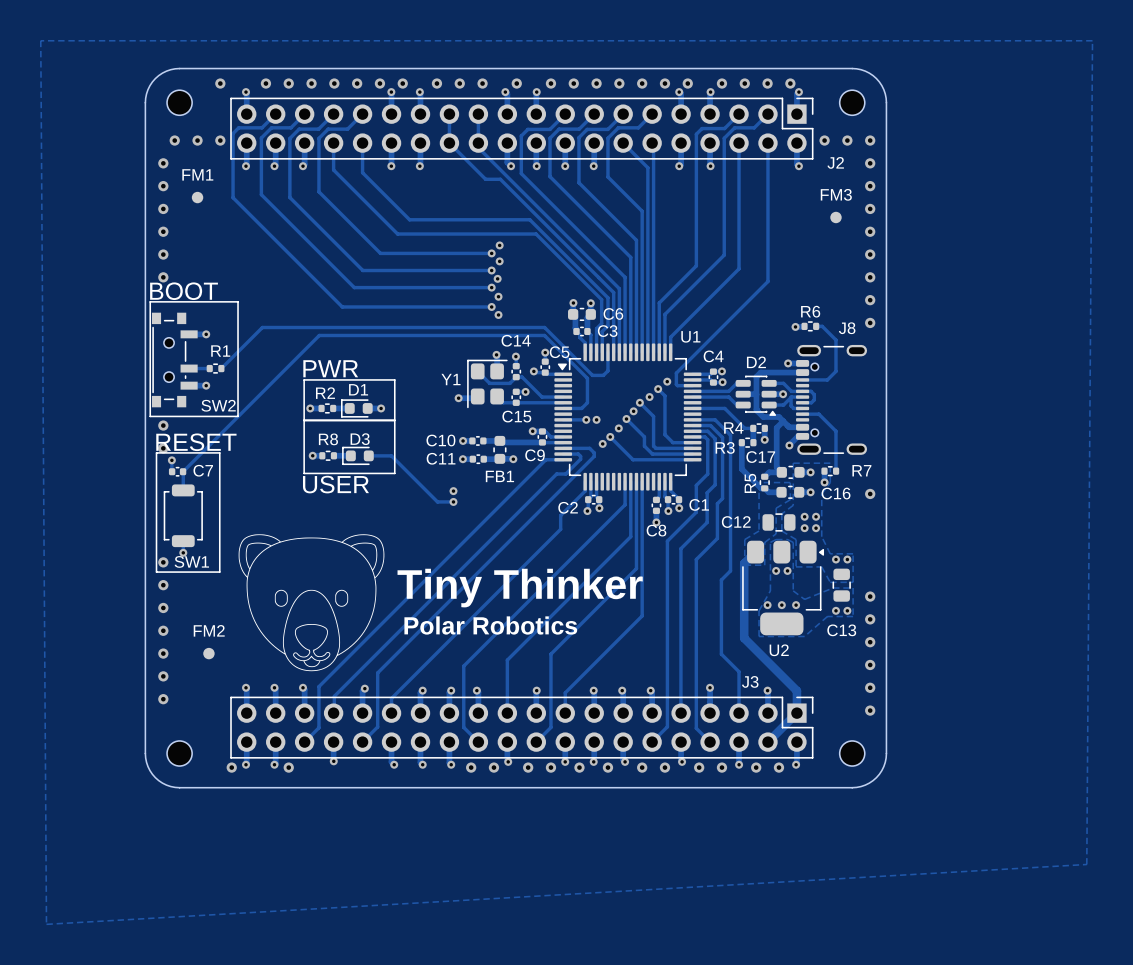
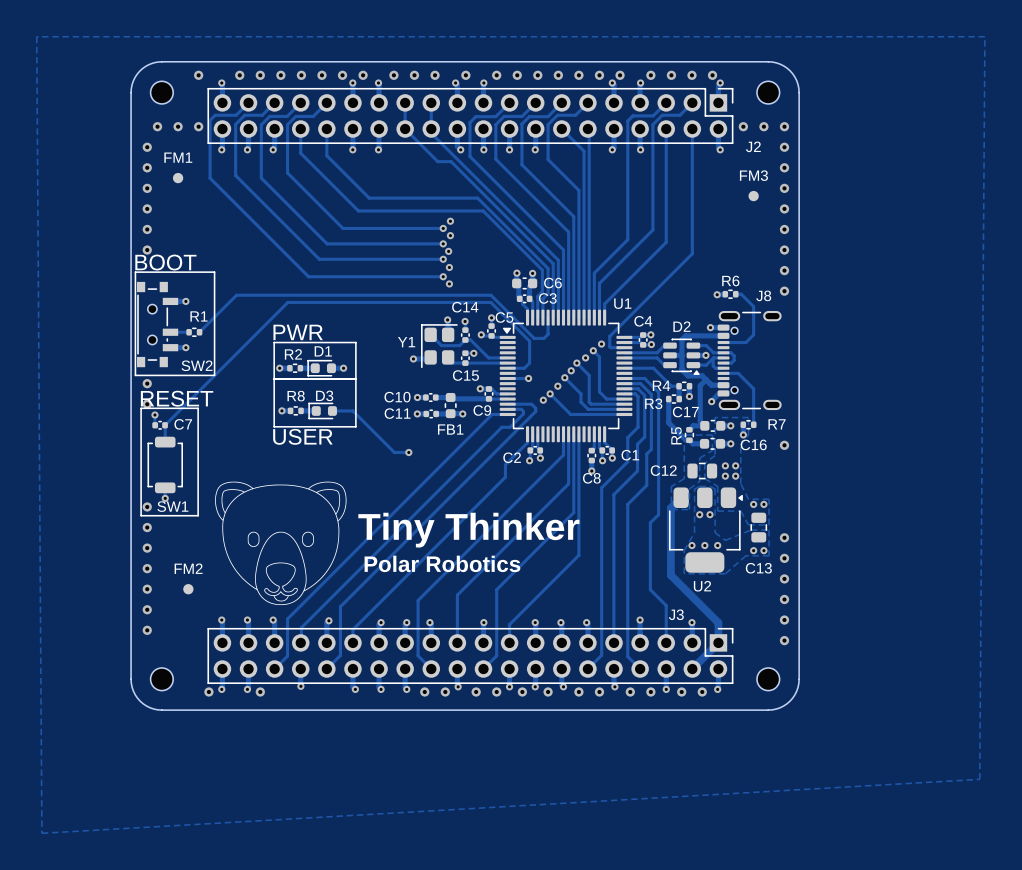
via: (596, 419) -> none
via: (453, 491) -> none

